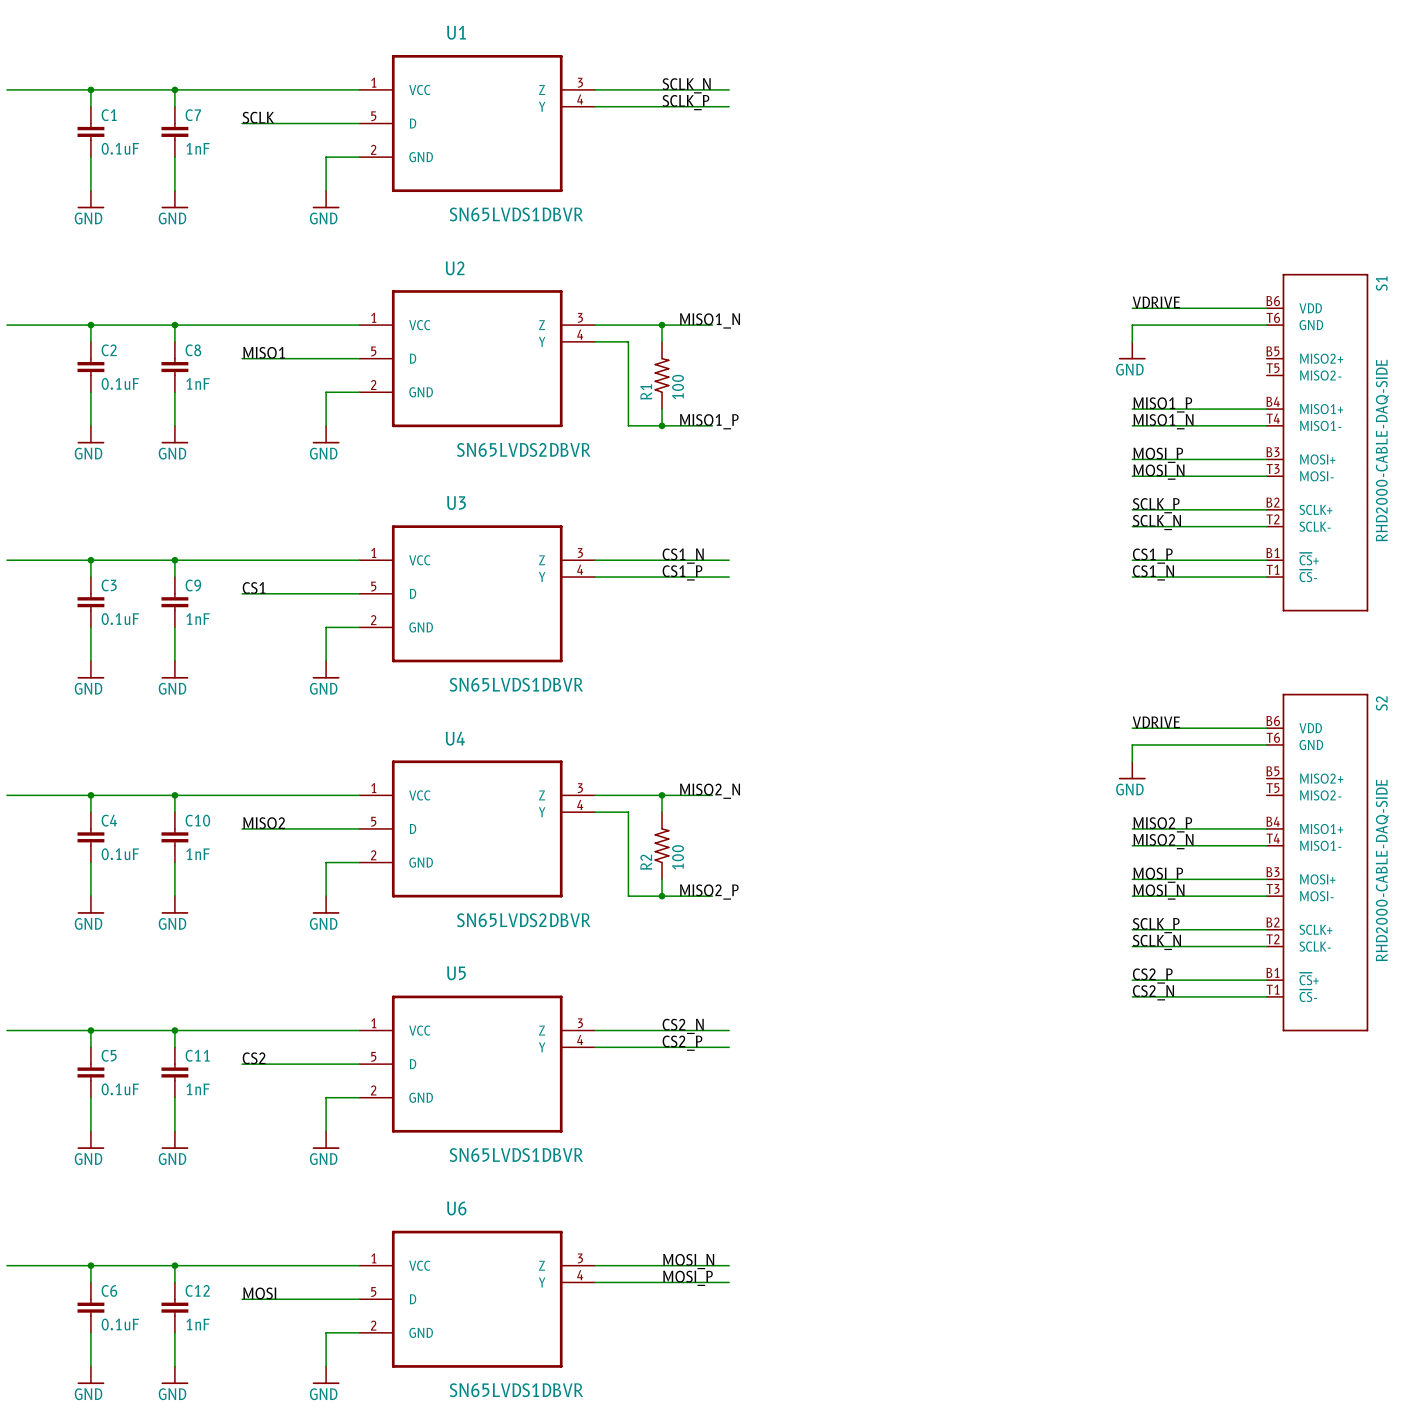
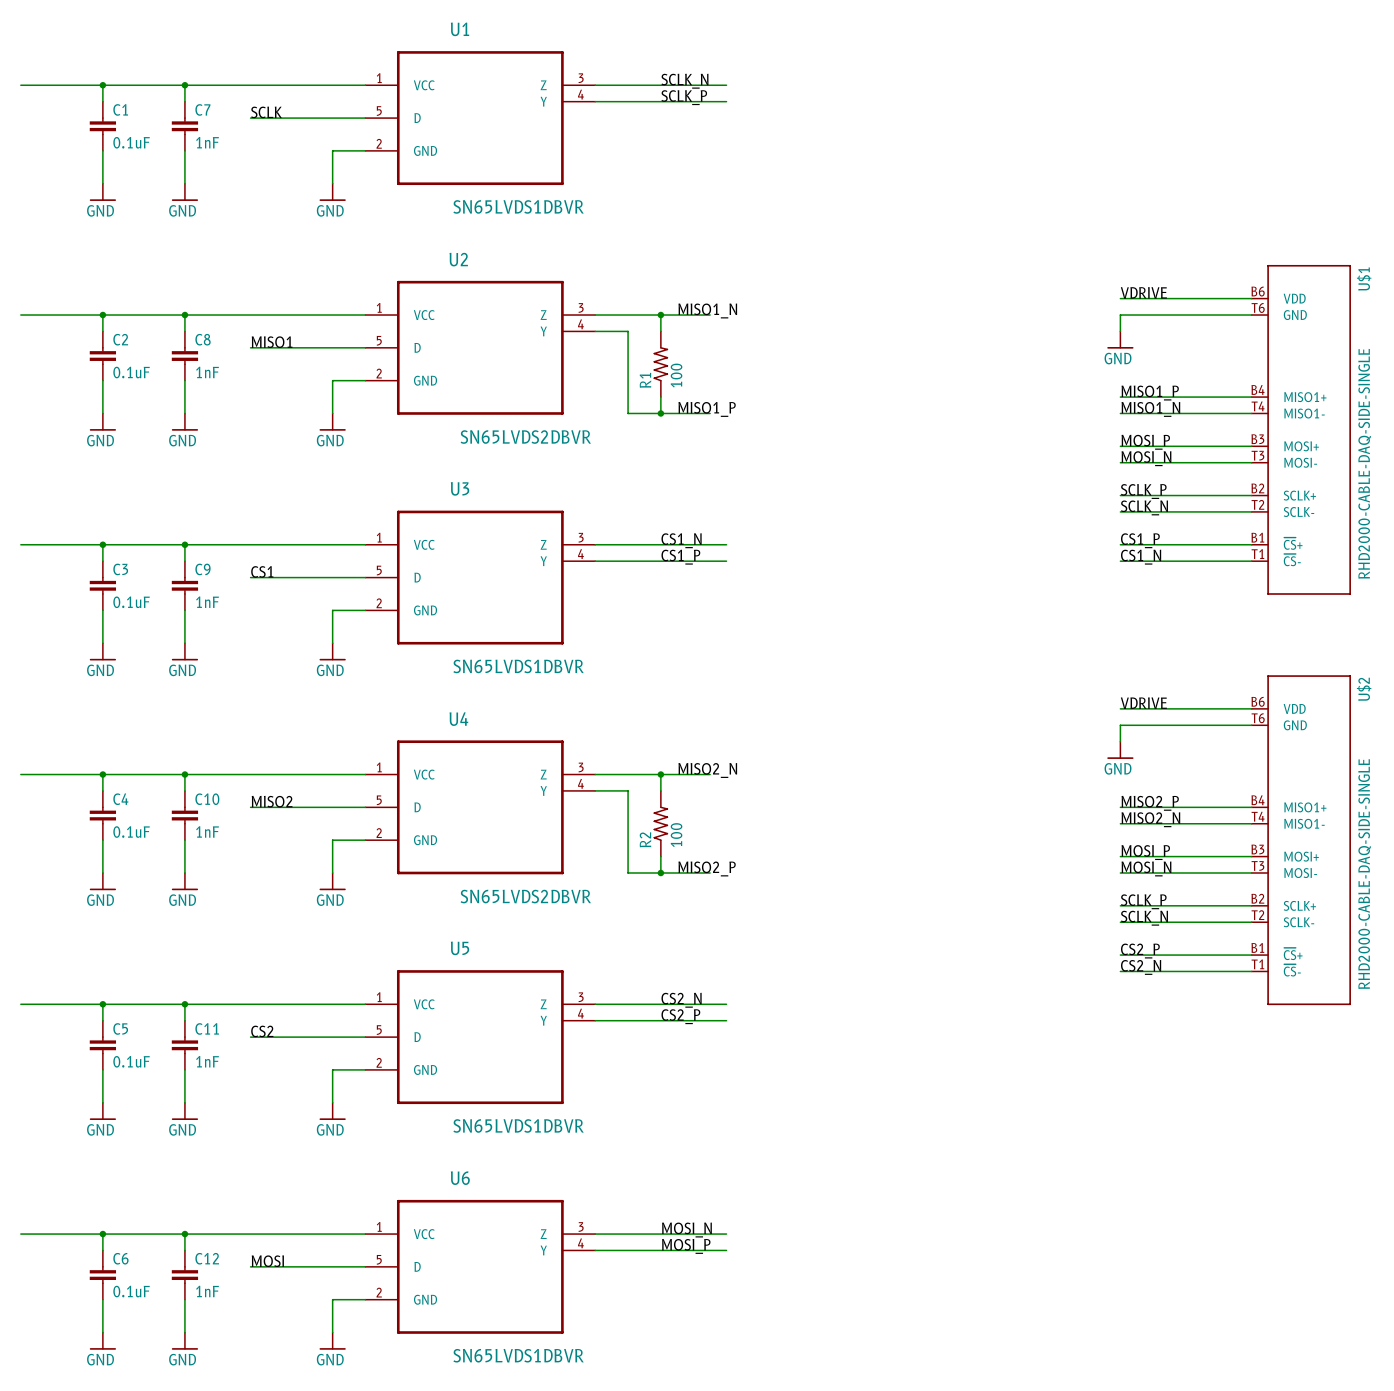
S1: RHD2000-CABLE-DAQ-SIDE (1317, 442) -> none
U$1: none -> RHD2000-CABLE-DAQ-SIDE-SINGLE (1301, 429)
S2: RHD2000-CABLE-DAQ-SIDE (1317, 862) -> none
U$2: none -> RHD2000-CABLE-DAQ-SIDE-SINGLE (1301, 840)

